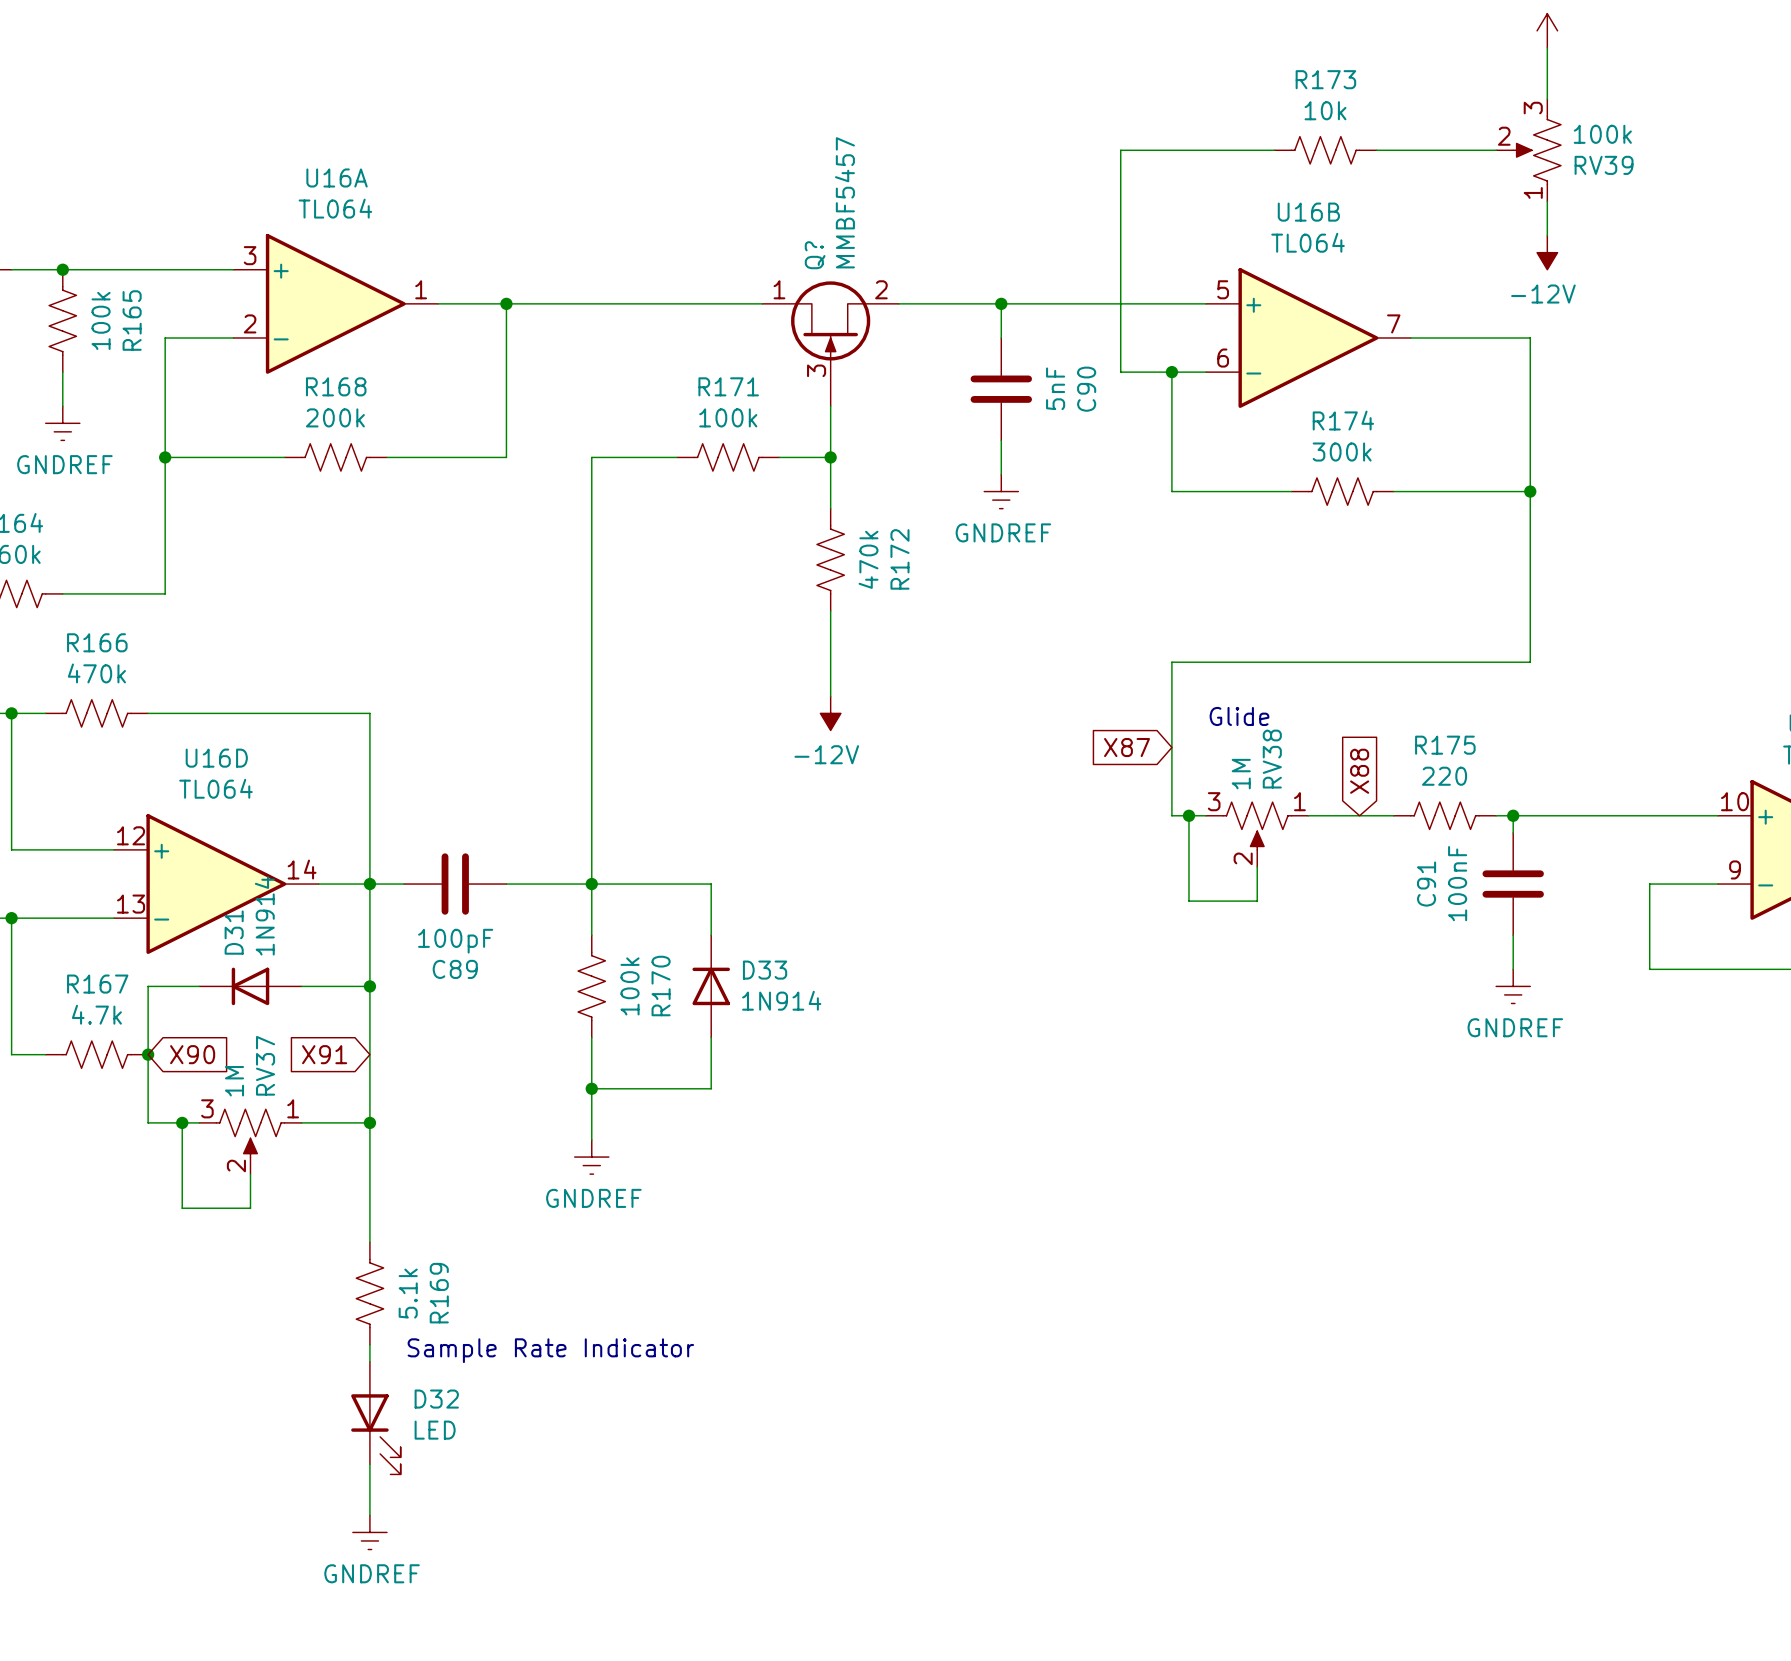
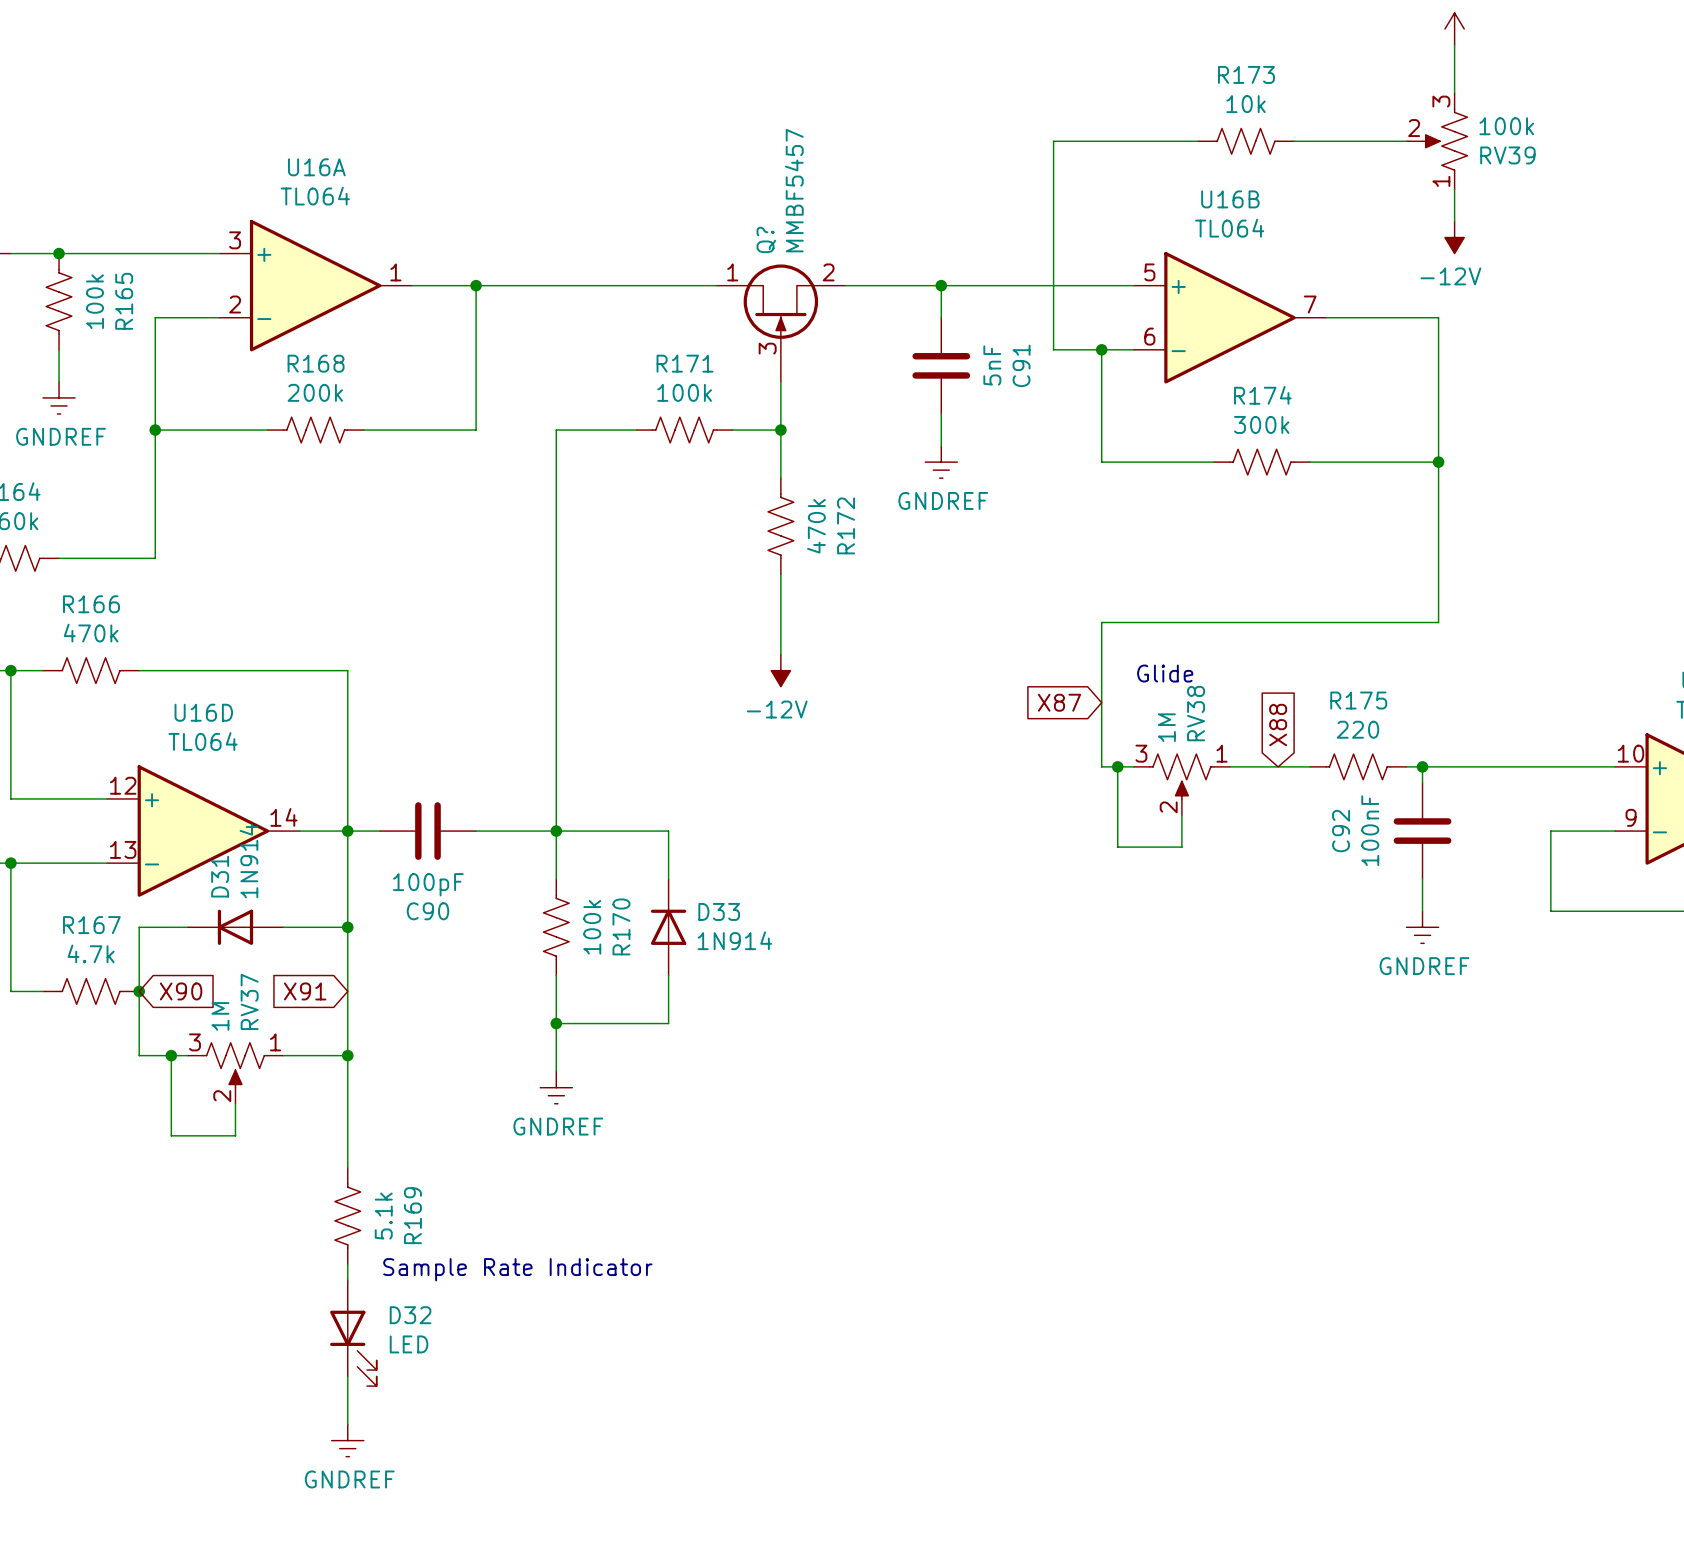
C90 name: C90 (1086, 389) -> C91 (1021, 365)
C91 name: C91 (1426, 884) -> C92 (1341, 831)
C89 name: C89 (455, 969) -> C90 (427, 911)

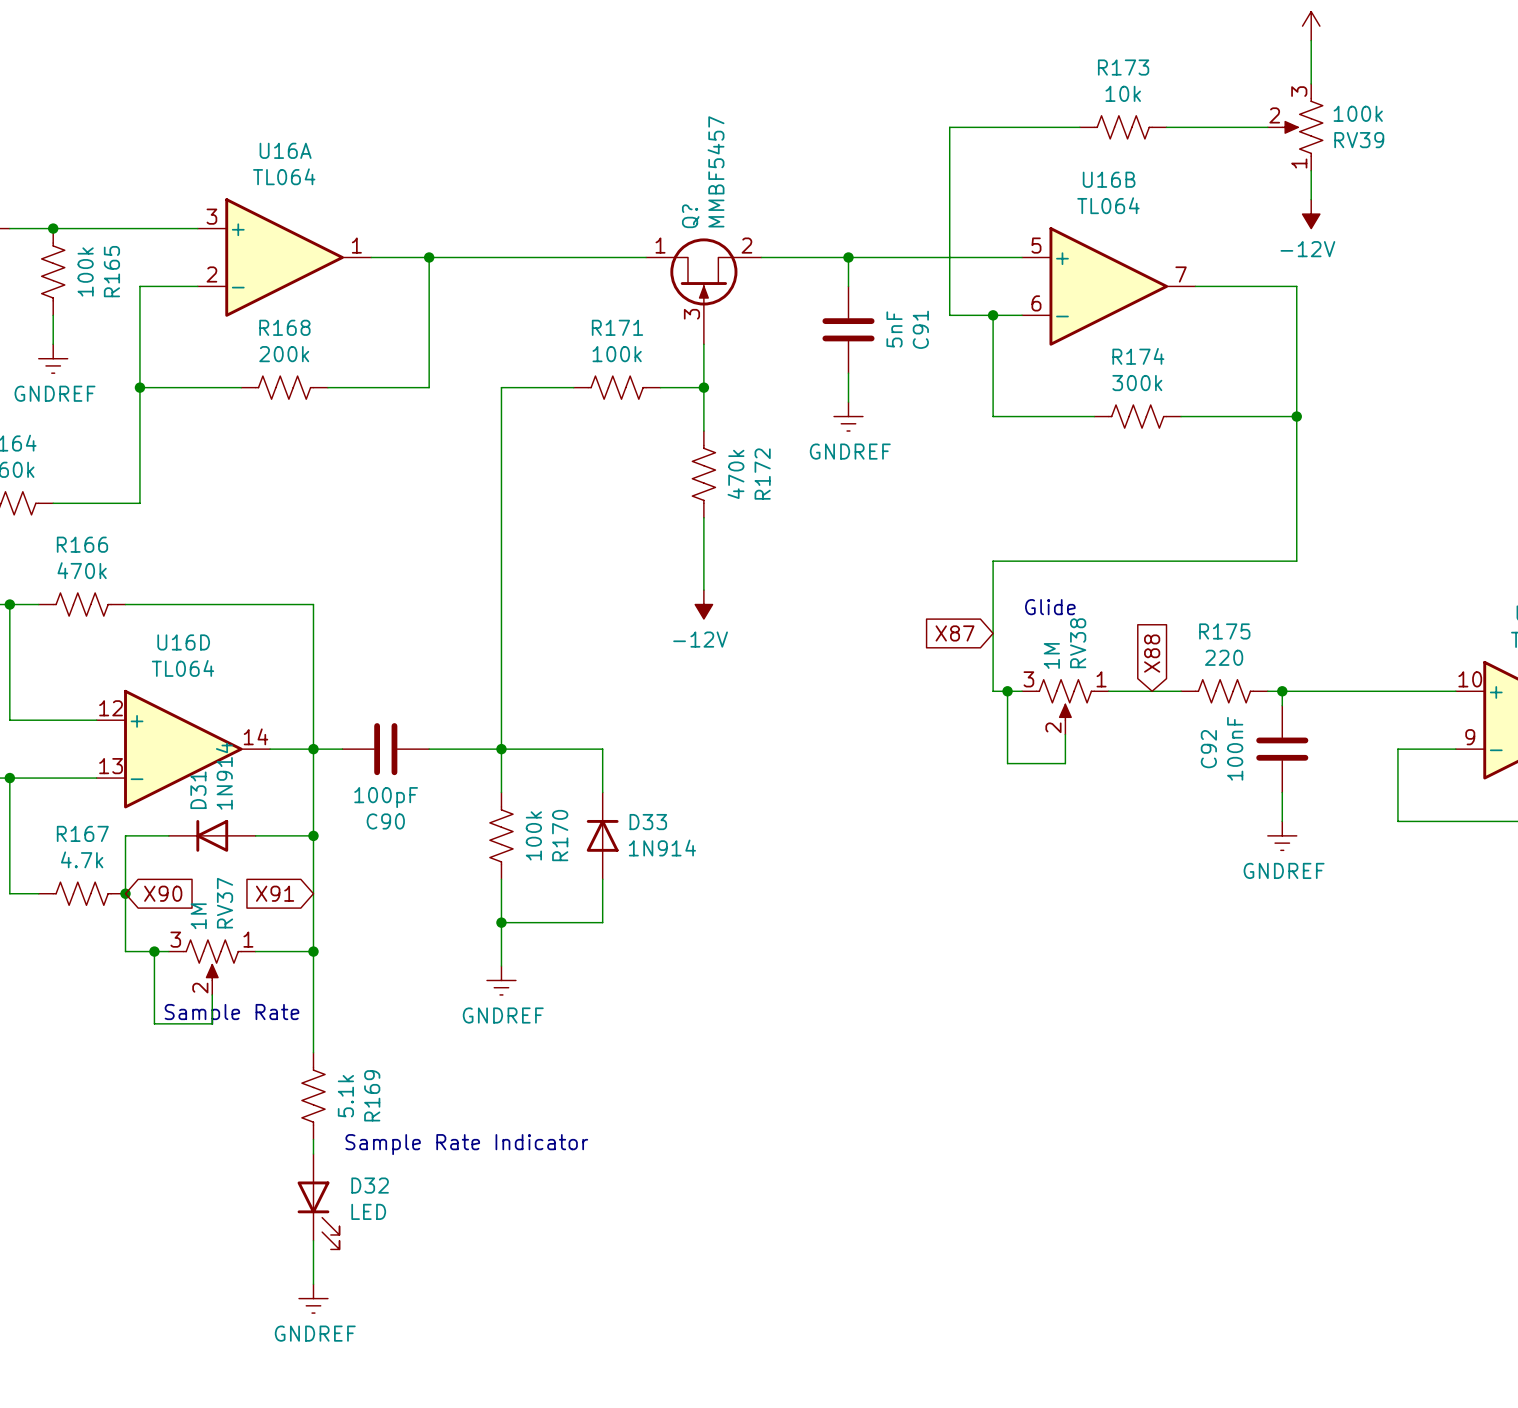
text: none -> Sample Rate (232, 1014)

